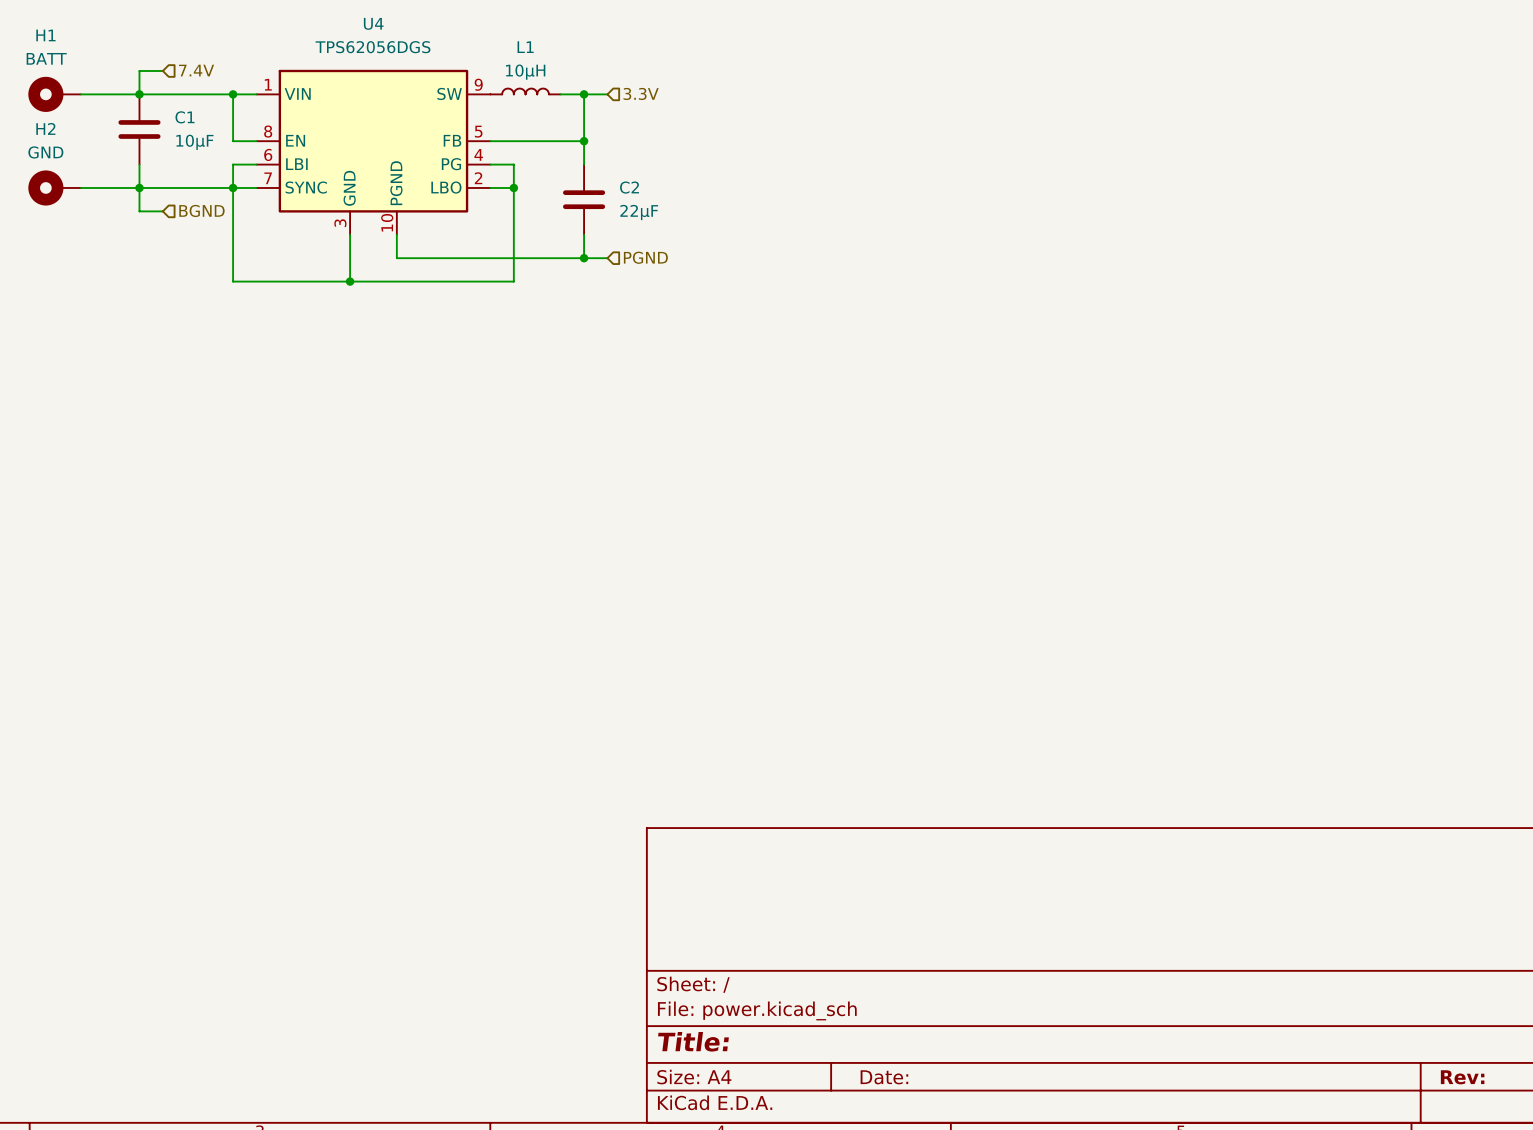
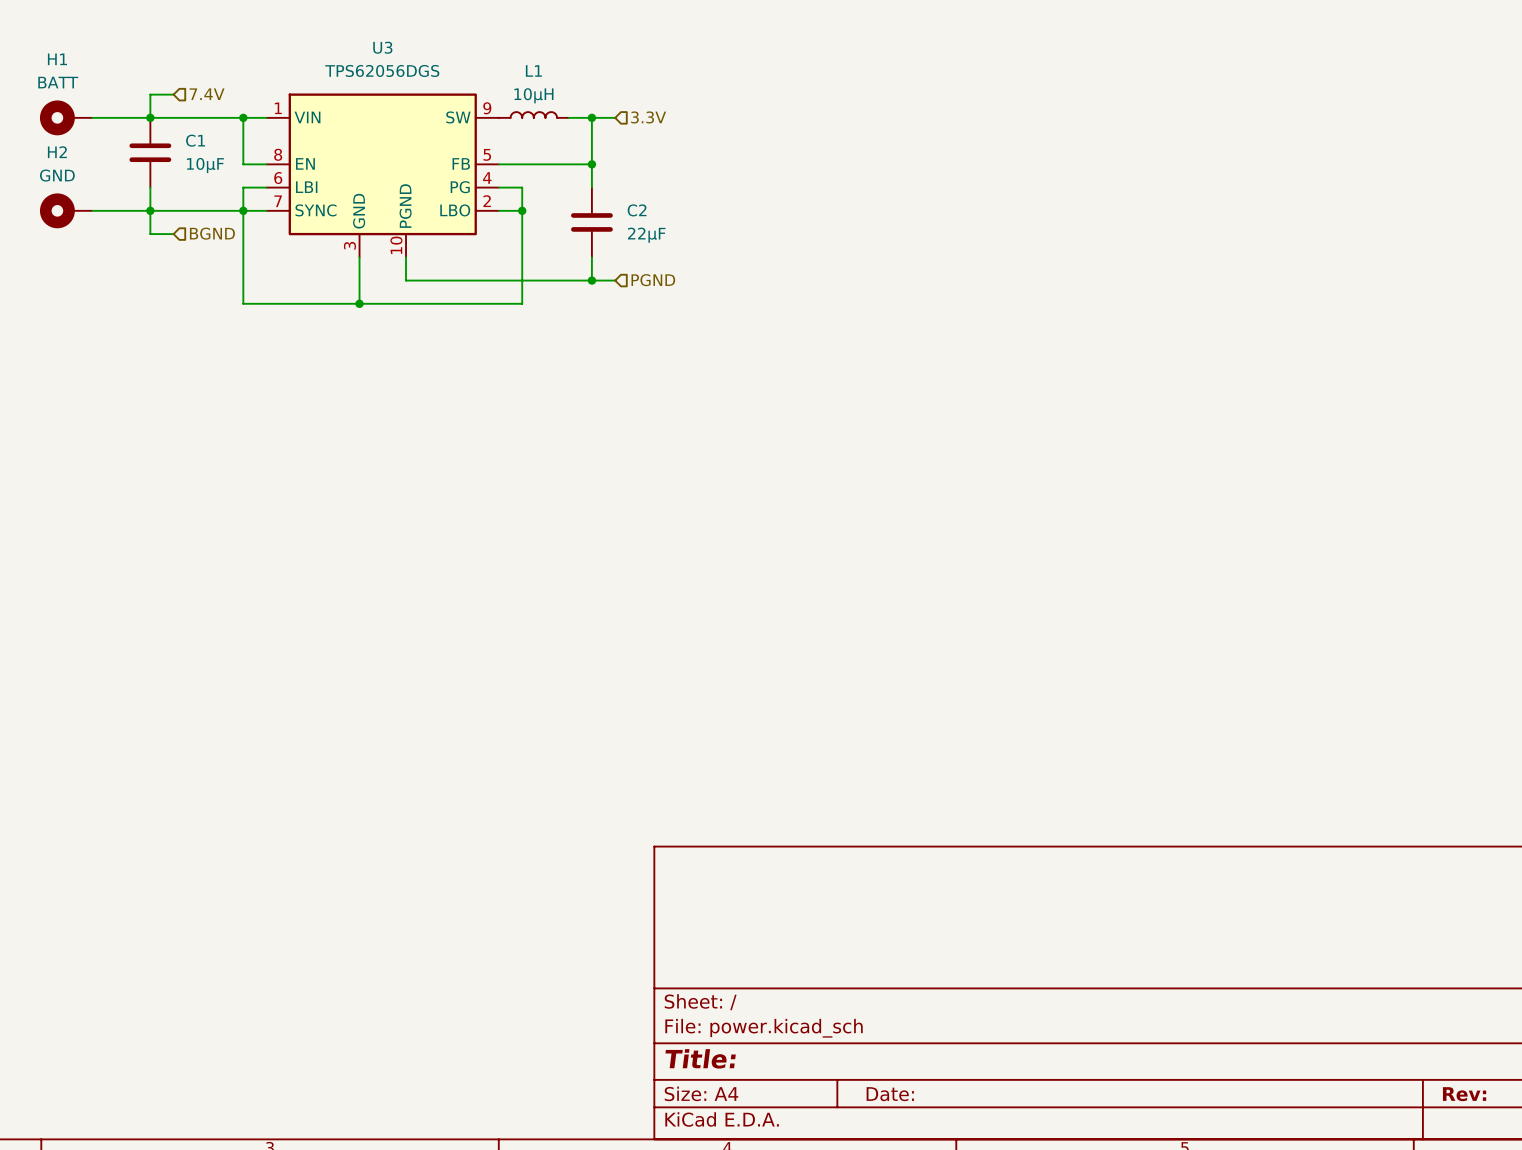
U4 name: U4 (373, 23) -> U3 (382, 47)

